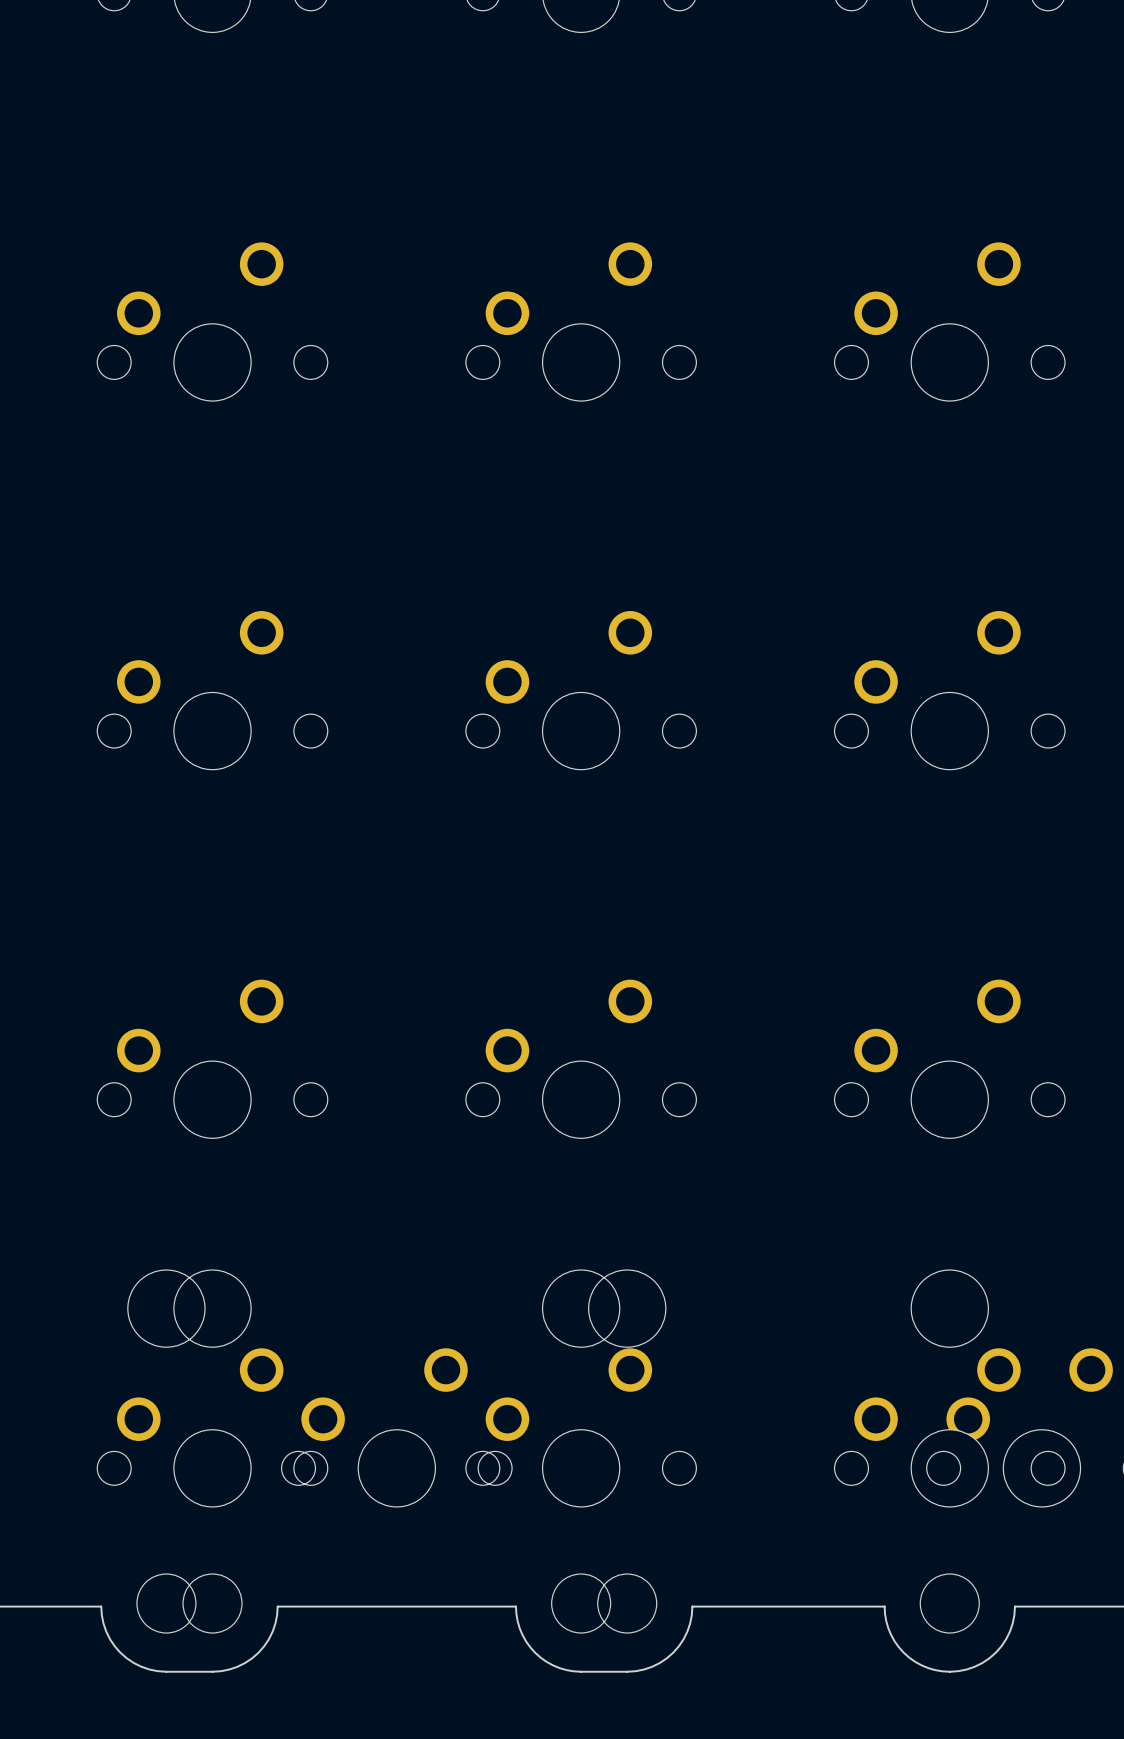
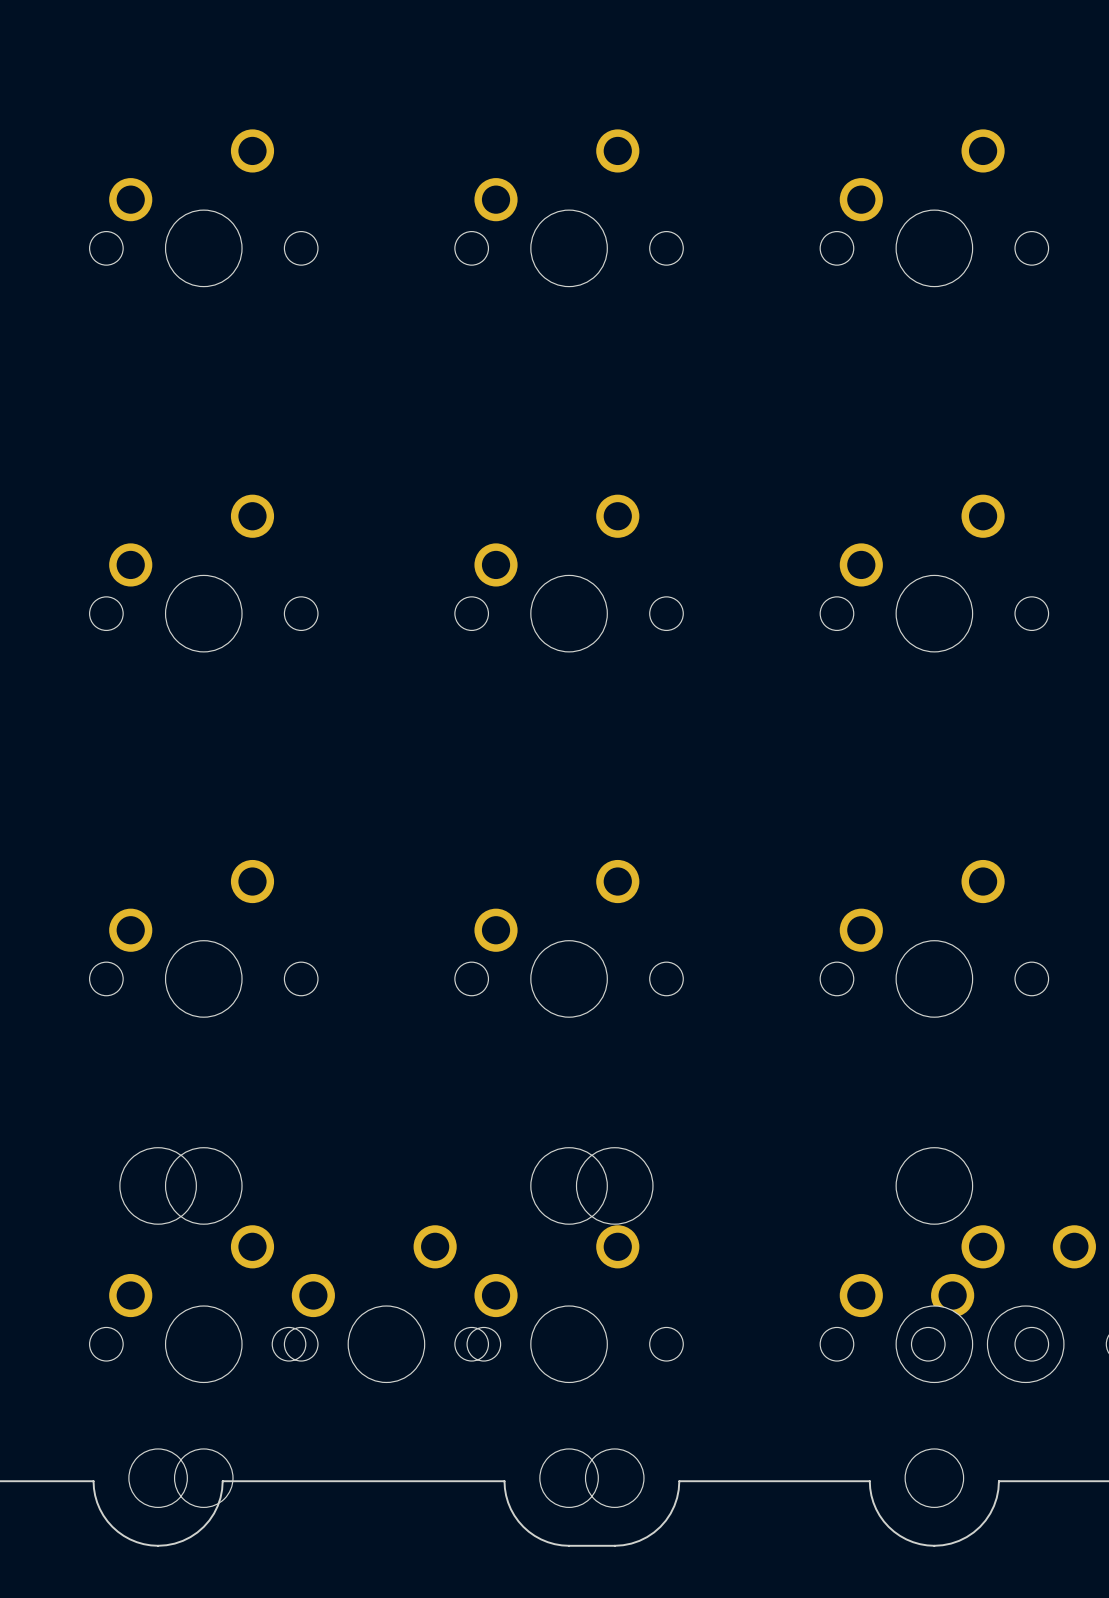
board edge: (101, 1606) (106, 1631) (120, 1652) (141, 1666) (166, 1671) (221, 1671) (245, 1663) (258, 1652) (268, 1639) (275, 1623) (277, 1606) -> (93, 1481) (95, 1495) (99, 1509) (112, 1526) (130, 1539) (143, 1544) (158, 1545) (182, 1540) (203, 1526) (217, 1505) (222, 1481) (268, 1481)

